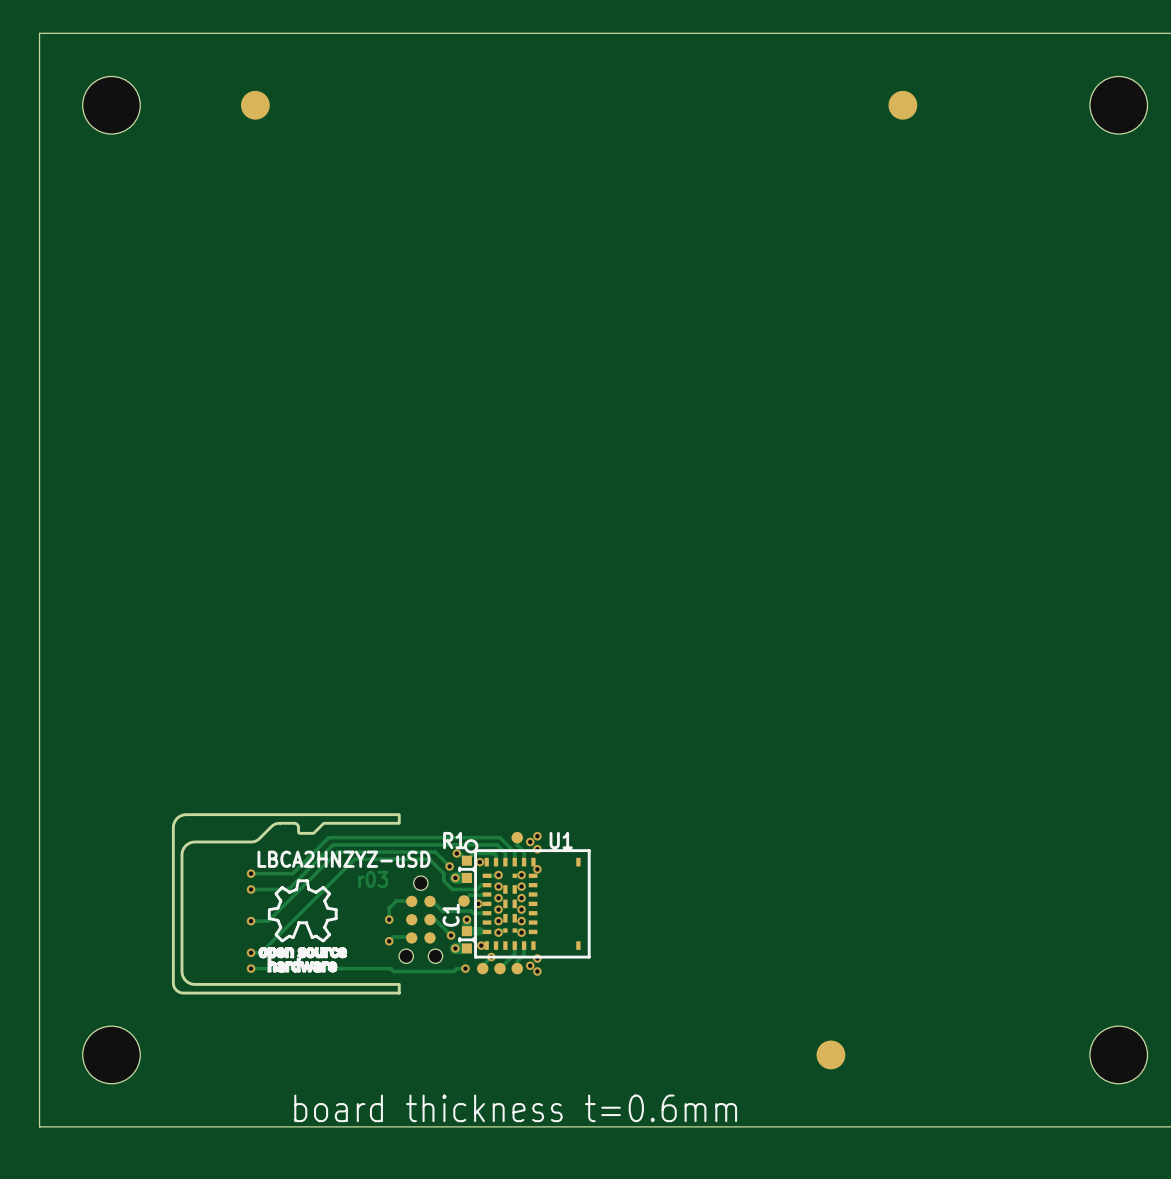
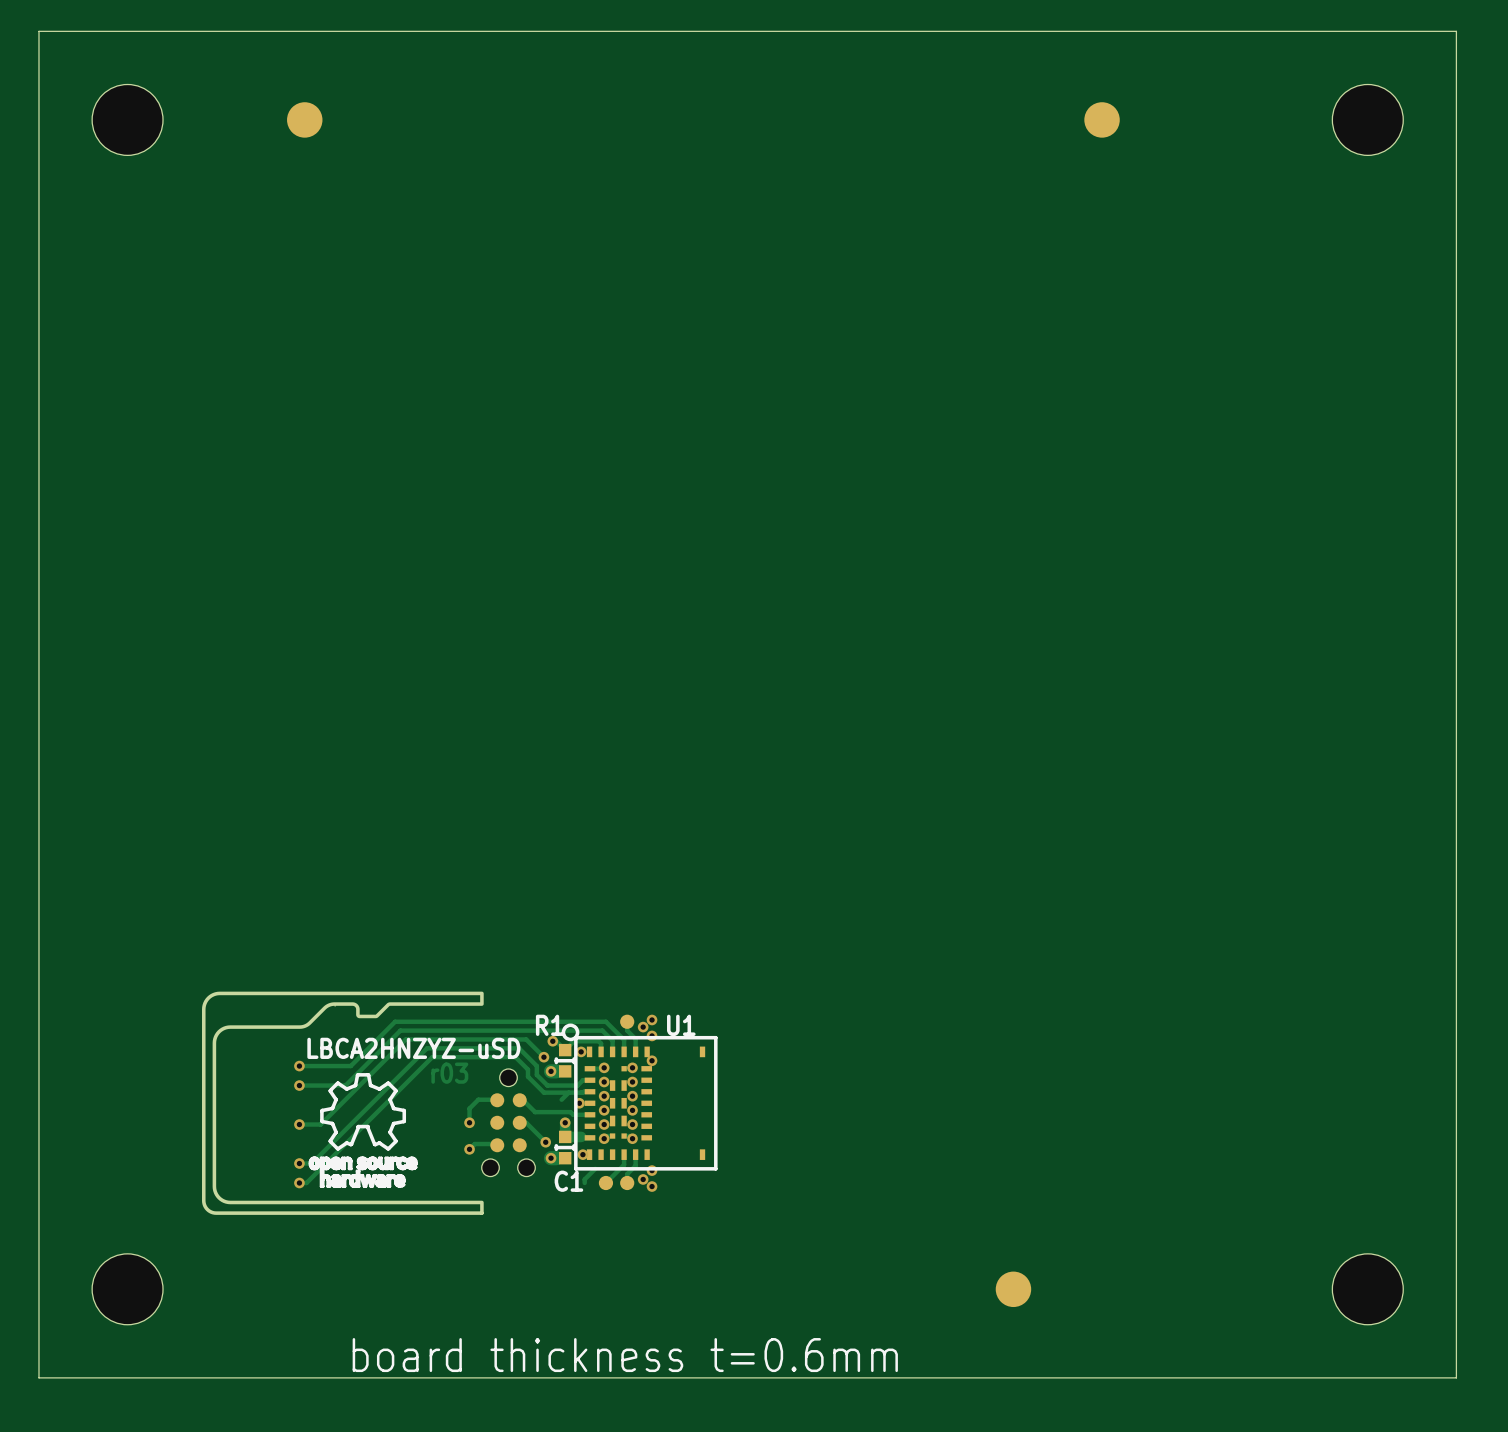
part: (464, 900) -> none
C1 name rotation: 0° (451, 915) -> 90° clockwise (568, 1181)
C1 name position: C1 (451, 915) -> C1 (568, 1181)
via: (491, 957) -> none
track: (256, 968) (390, 968) (393, 971) (453, 971) (456, 968) (465, 968) -> (306, 1183) (432, 1057) (515, 1057) (527, 1069) (527, 1076) (543, 1092) (568, 1092)
via: (465, 968) -> none
part: (482, 968) -> none

